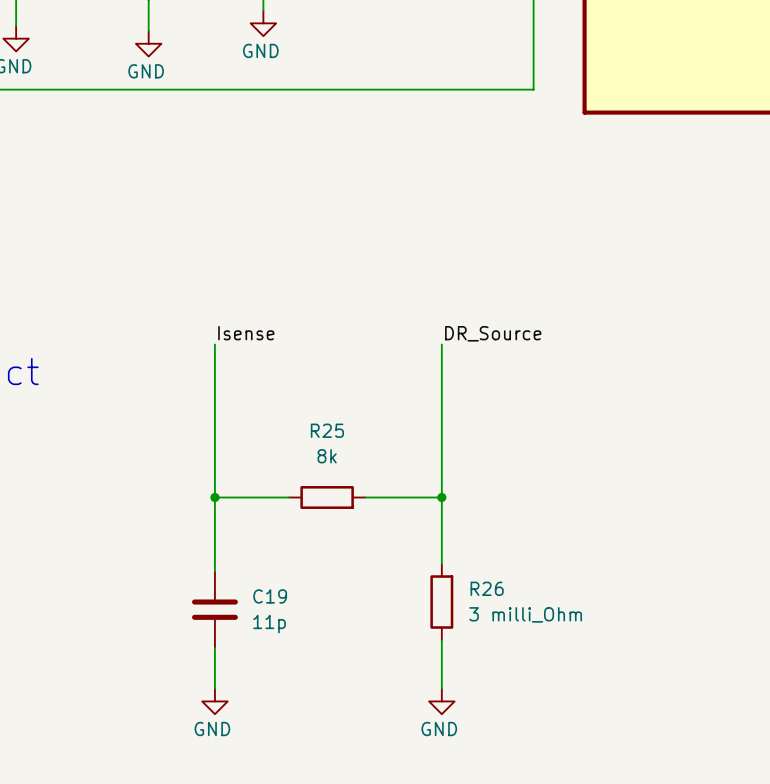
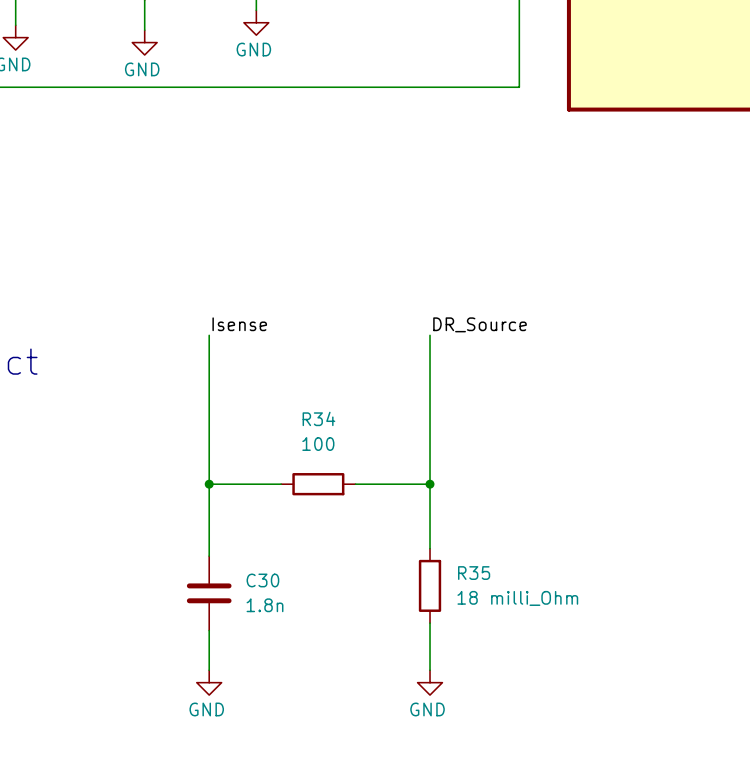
R25 name: R25 (327, 430) -> R34 (318, 418)
R25 value: 8k (327, 456) -> 100 (318, 444)
R26 name: R26 (487, 588) -> R35 (474, 573)
C19 name: C19 (270, 596) -> C30 (262, 580)
R26 value: 3 milli_Ohm (525, 614) -> 18 milli_Ohm (517, 598)
C19 value: 11p (269, 624) -> 1.8n (265, 605)

